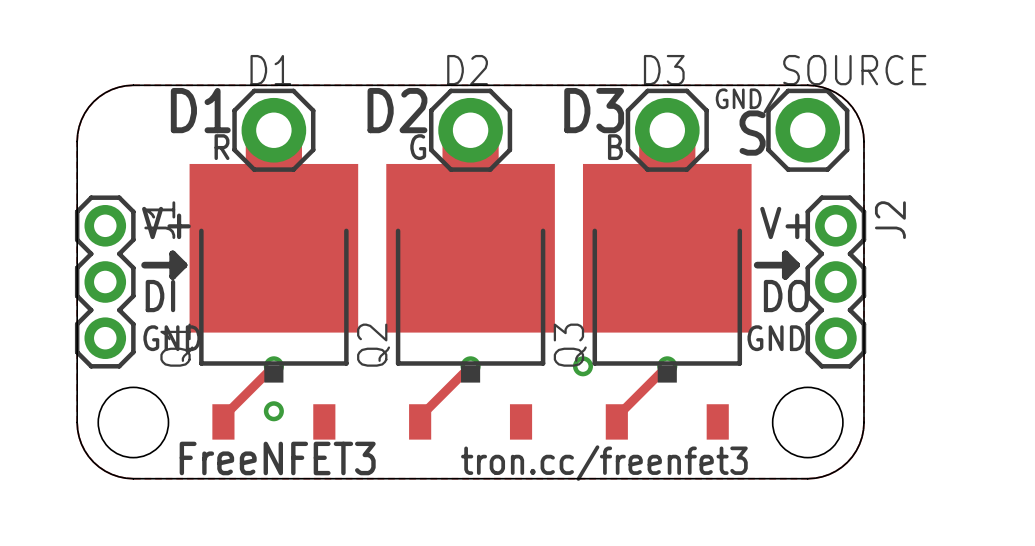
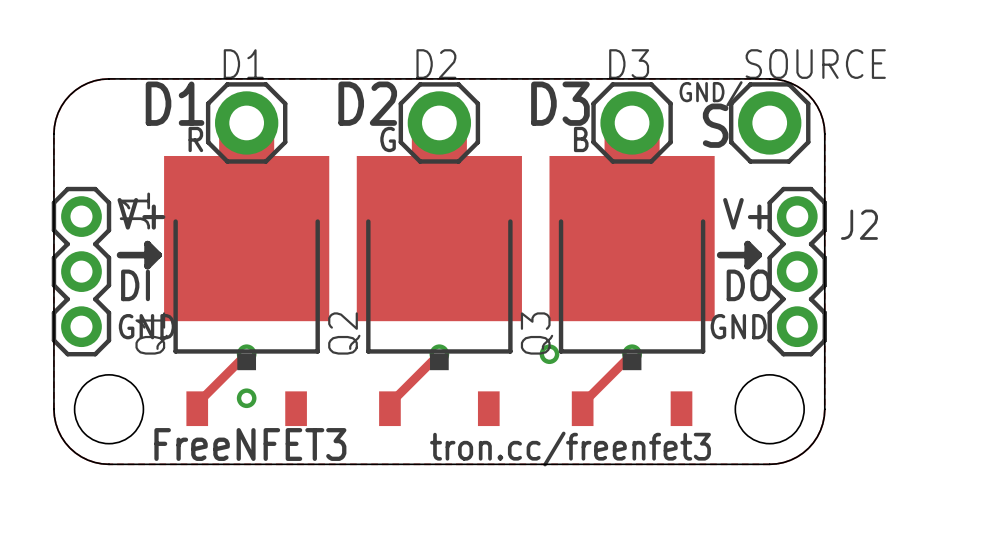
J2 name rotation: 0° (890, 220) -> 90° clockwise (859, 224)

